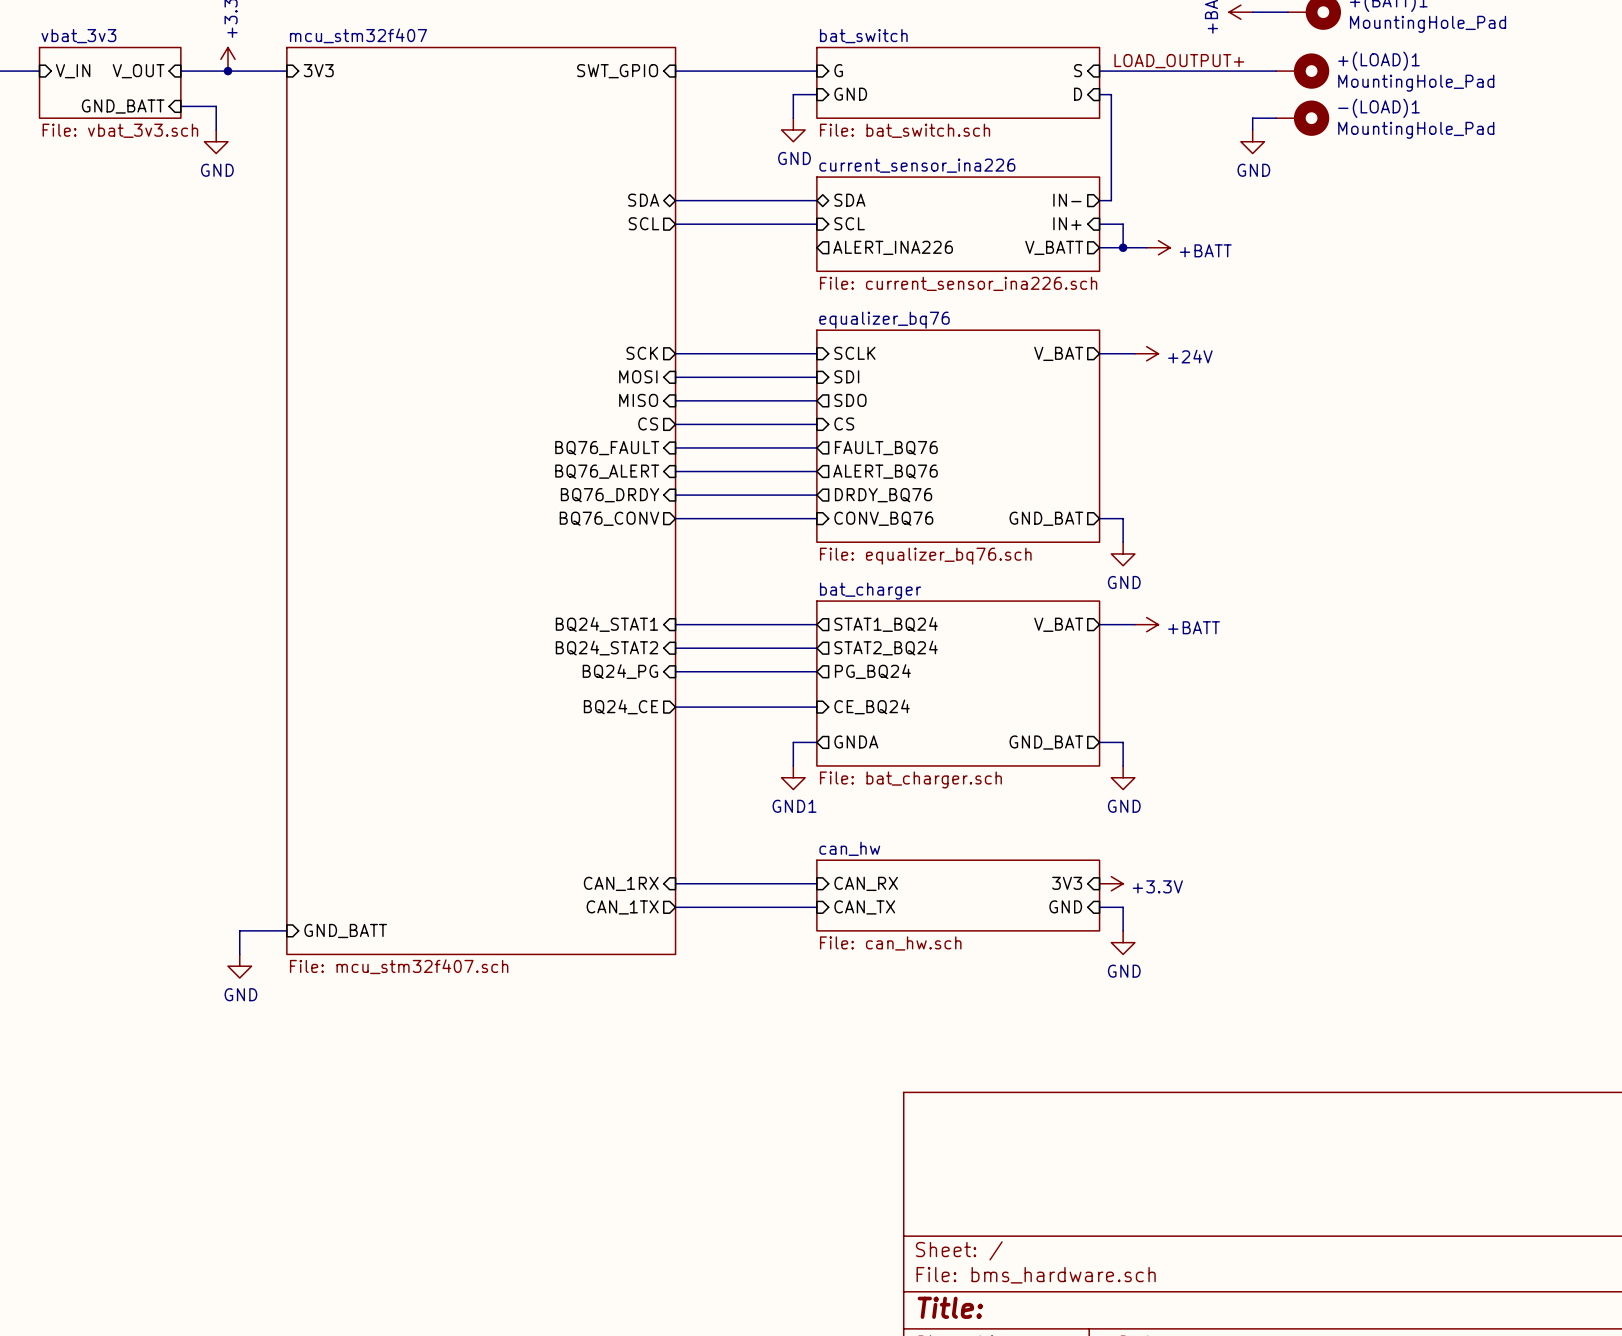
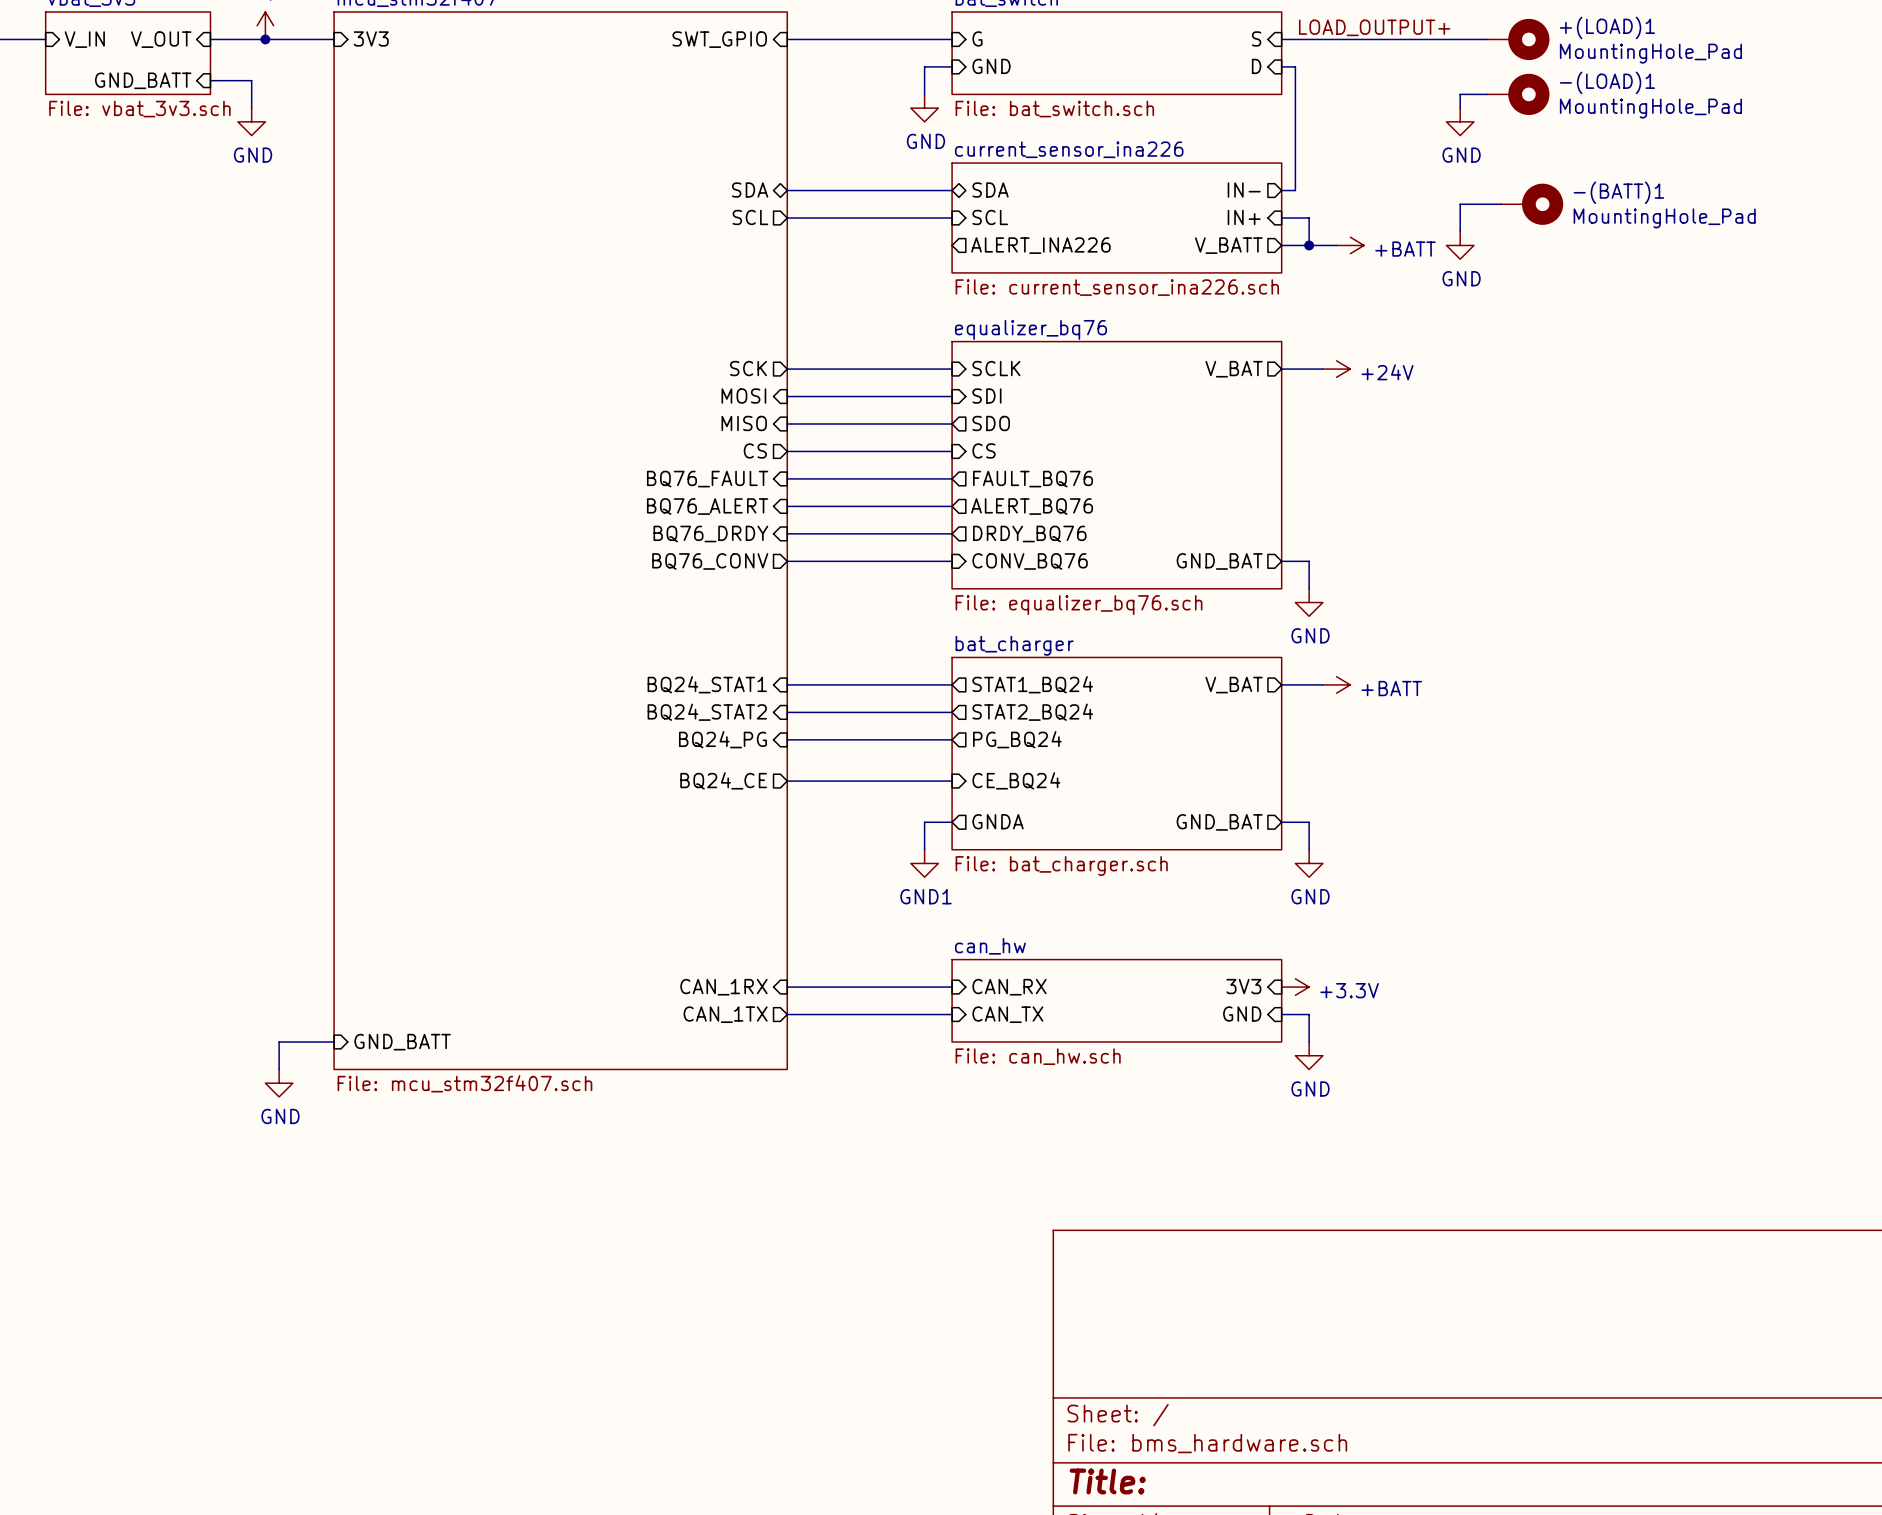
wire: none -> (1501, 204) (1460, 204) (1460, 231)
-(BATT)1: none -> MountingHole_Pad (1532, 204)
power symbol: none -> GND (1460, 245)

